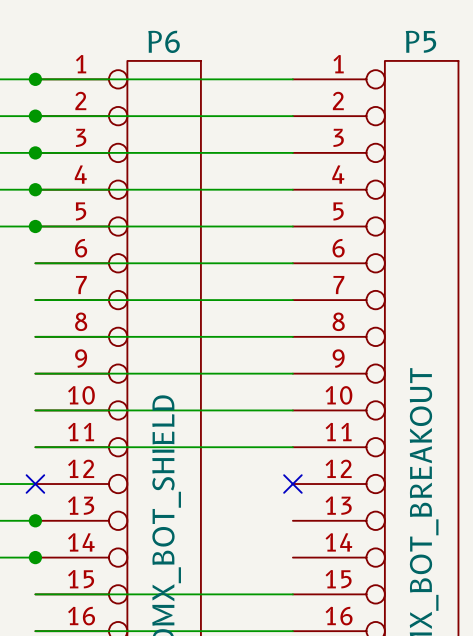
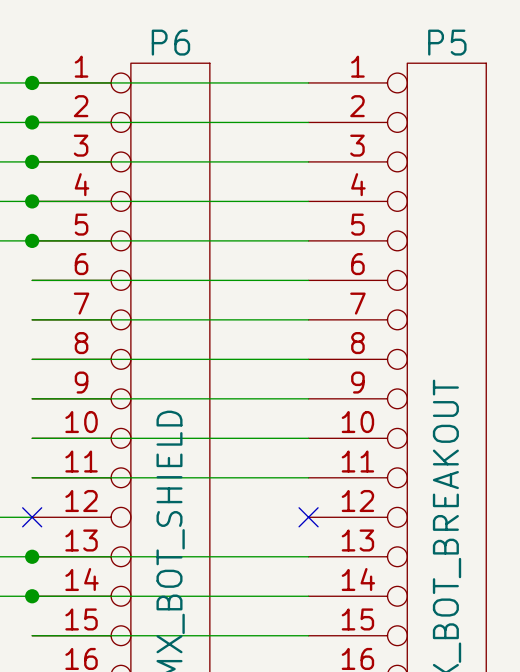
wire: none -> (32, 556) (308, 556)
wire: none -> (32, 596) (308, 596)

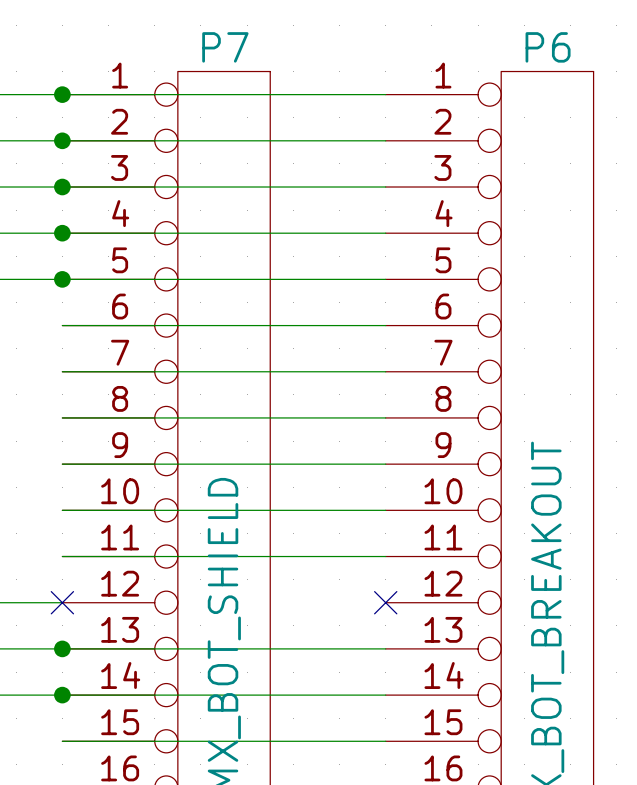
P6 name: P6 (170, 42) -> P7 (225, 47)
P5 name: P5 (447, 42) -> P6 (548, 47)

